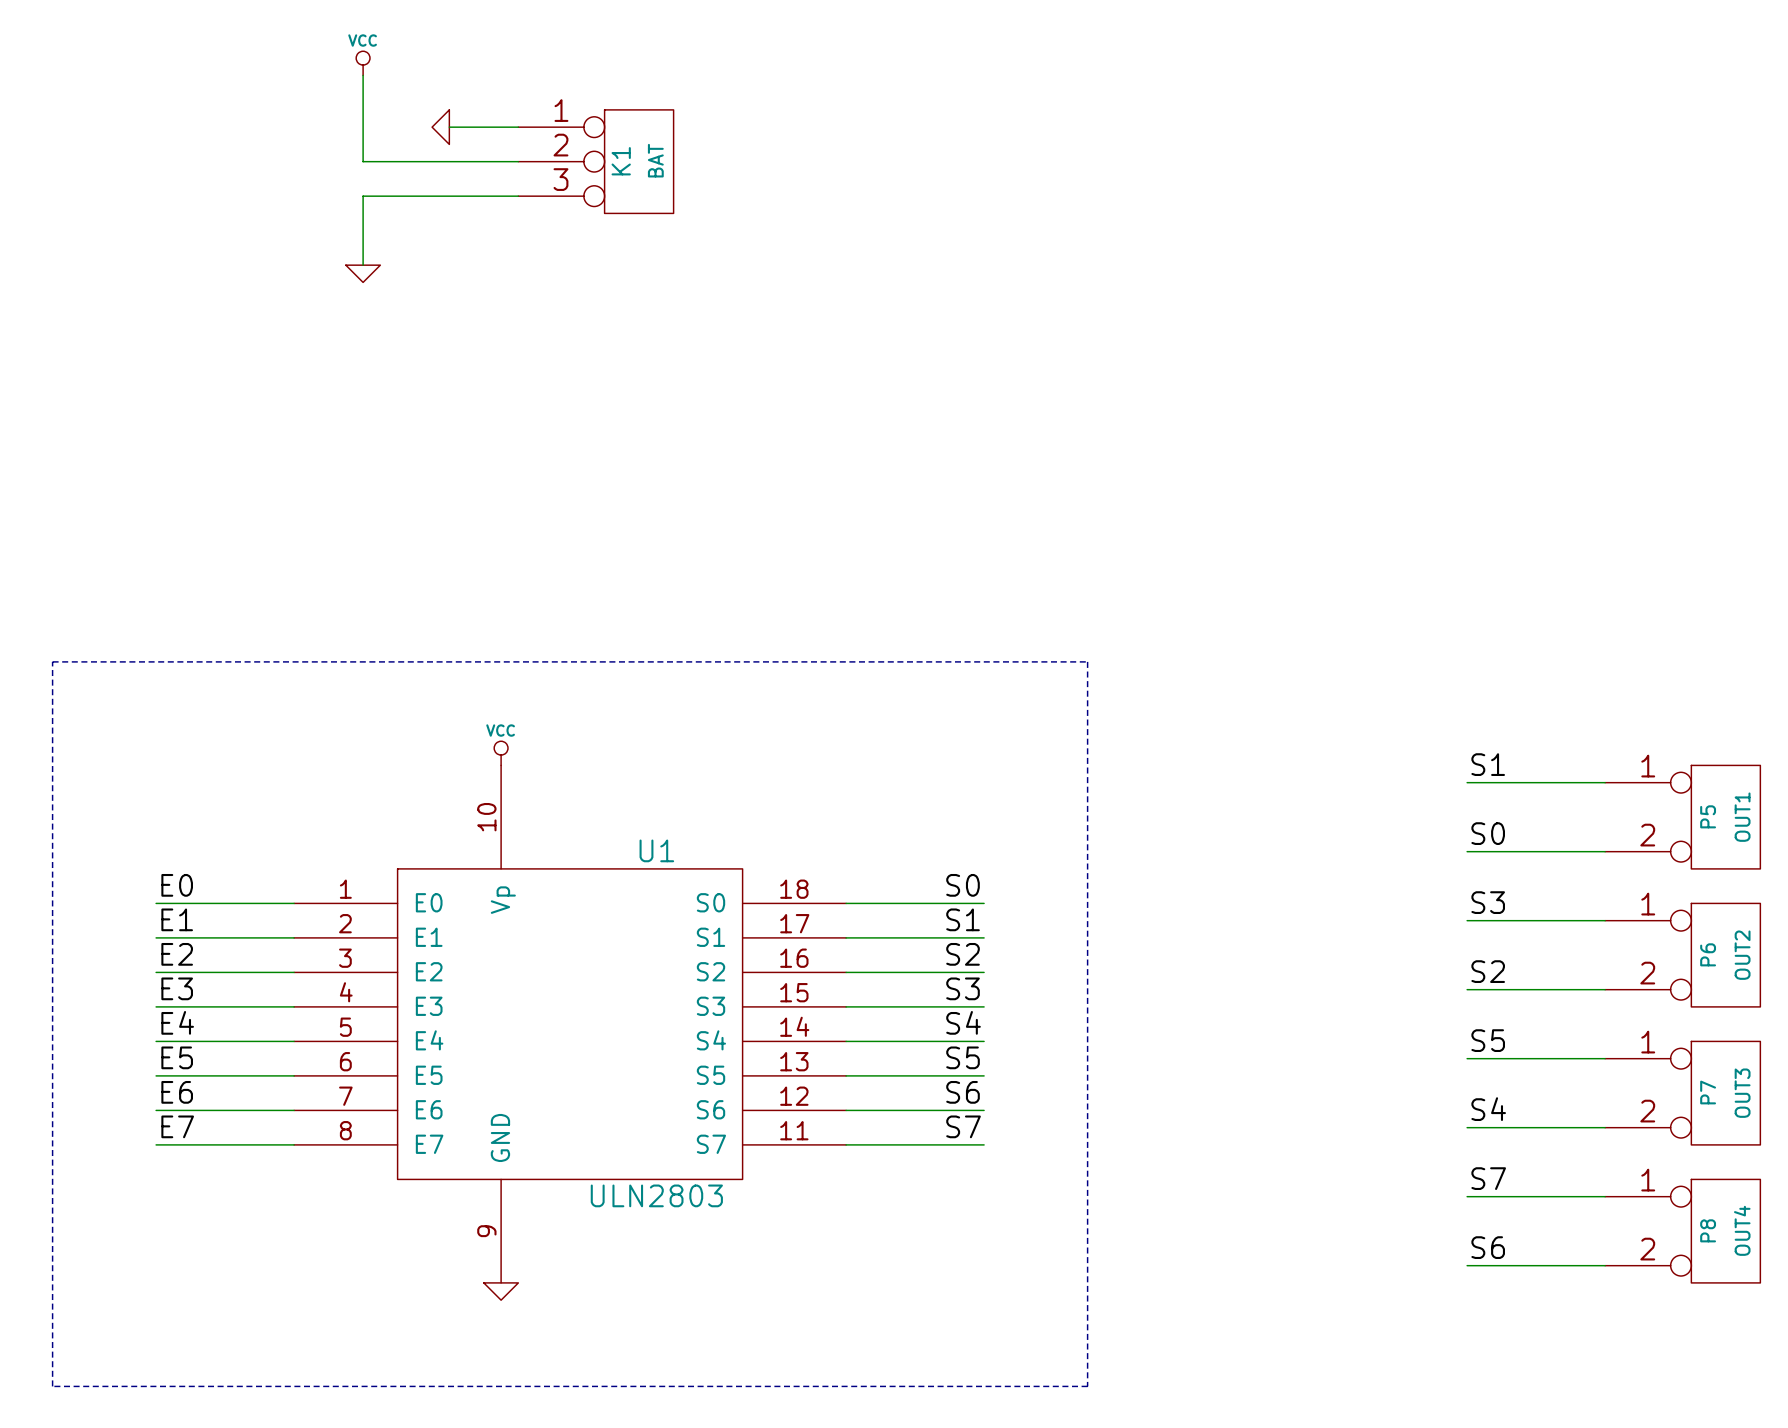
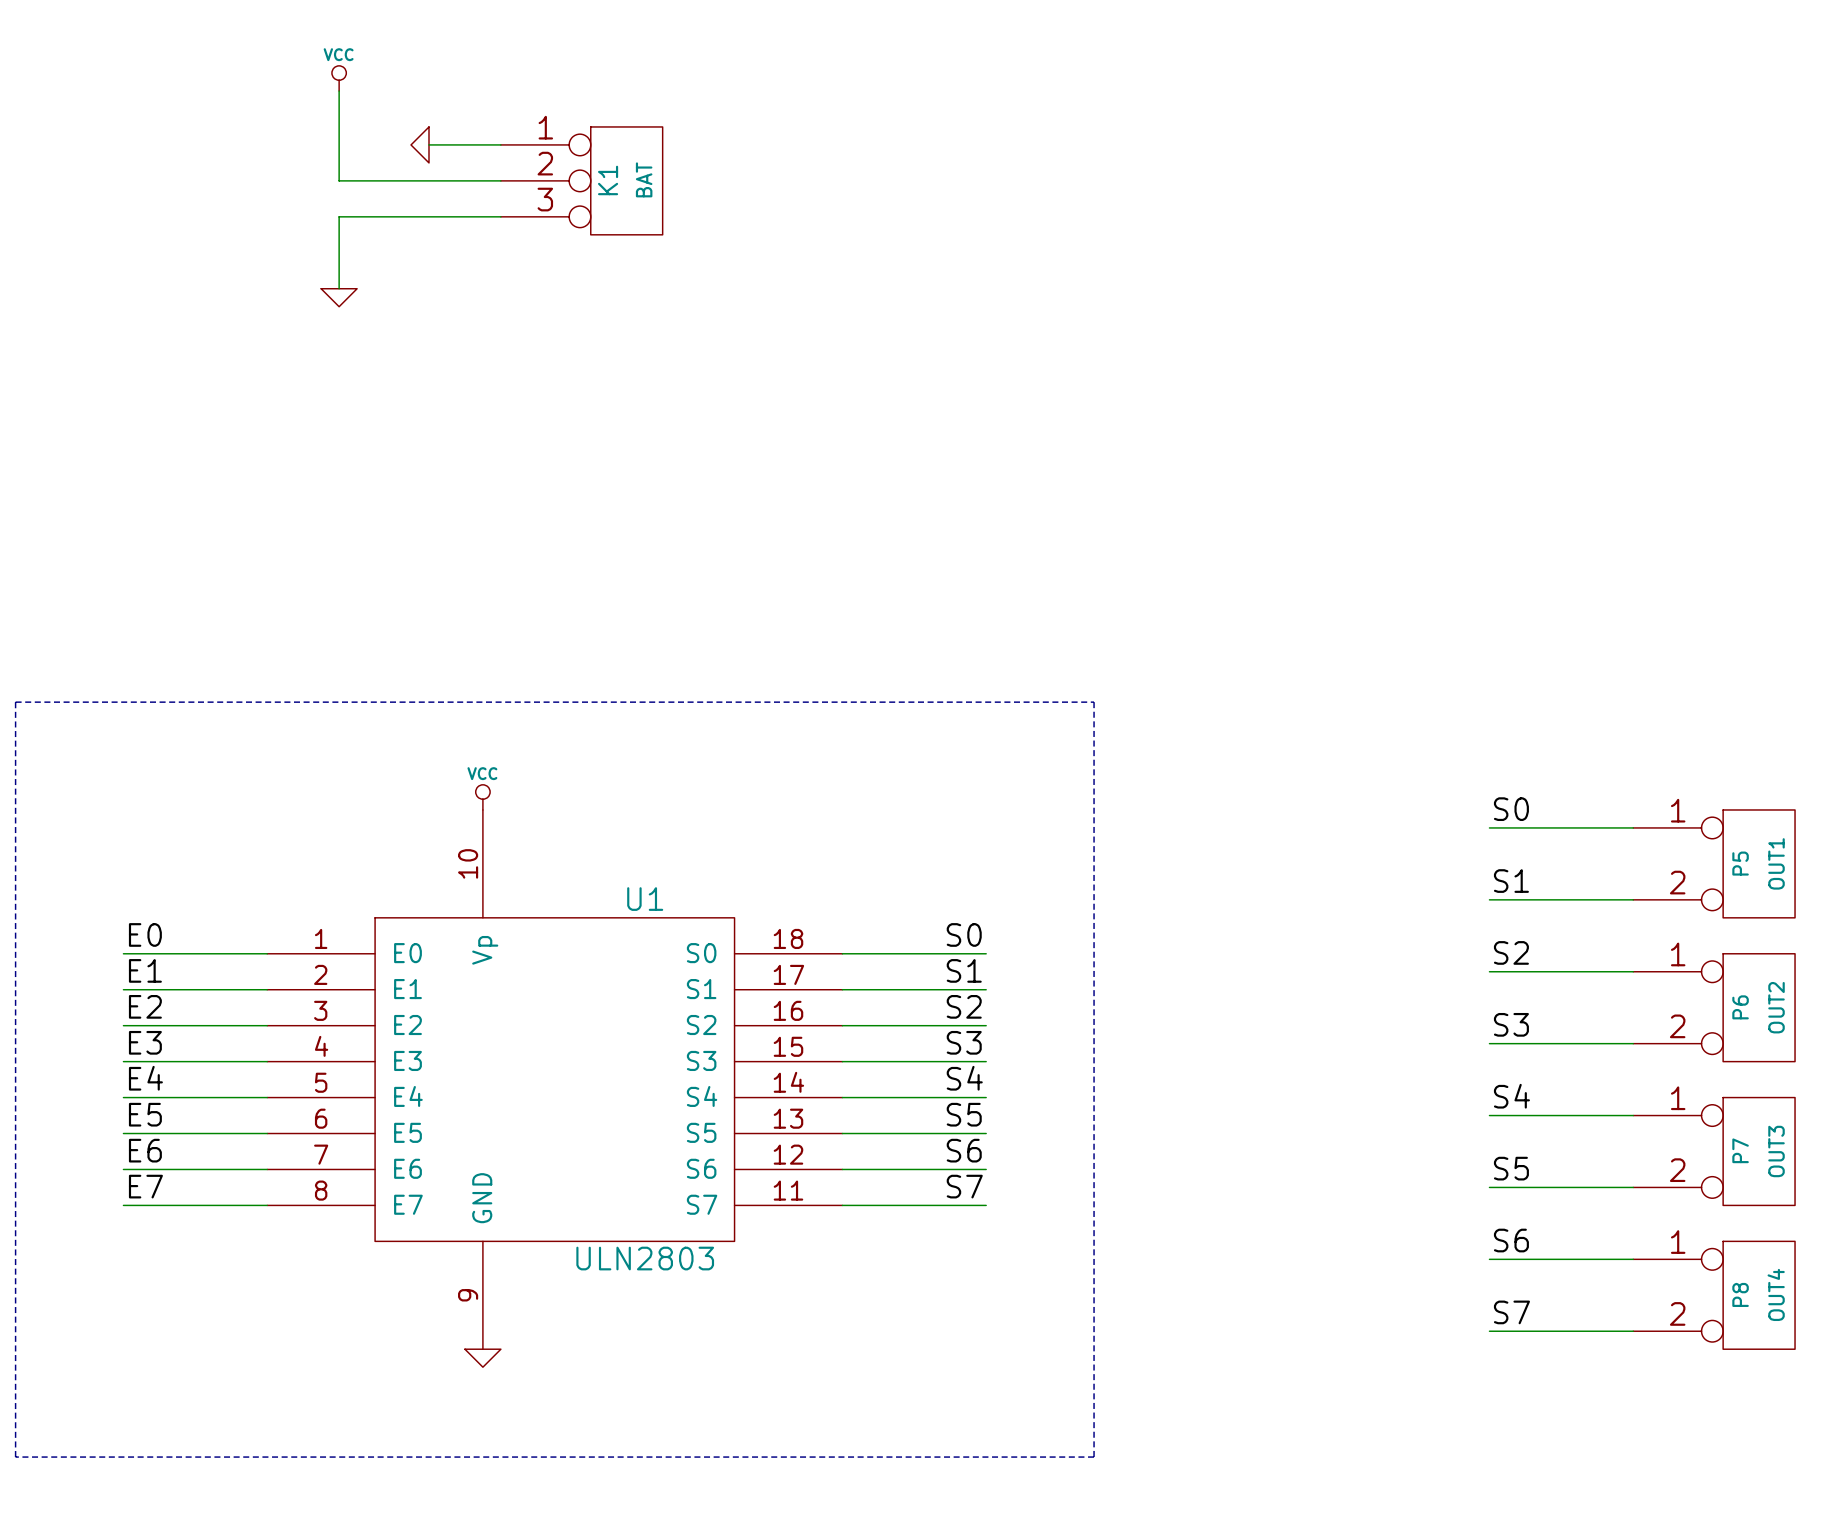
label: S1 (1488, 764) -> S0 (1511, 809)
label: S0 (1488, 833) -> S1 (1511, 881)
label: S3 (1488, 902) -> S2 (1511, 952)
label: S2 (1488, 971) -> S3 (1511, 1024)
label: S5 (1488, 1040) -> S4 (1511, 1096)
label: S4 (1488, 1109) -> S5 (1511, 1168)
label: S7 (1488, 1178) -> S6 (1511, 1240)
label: S6 (1488, 1247) -> S7 (1511, 1312)

